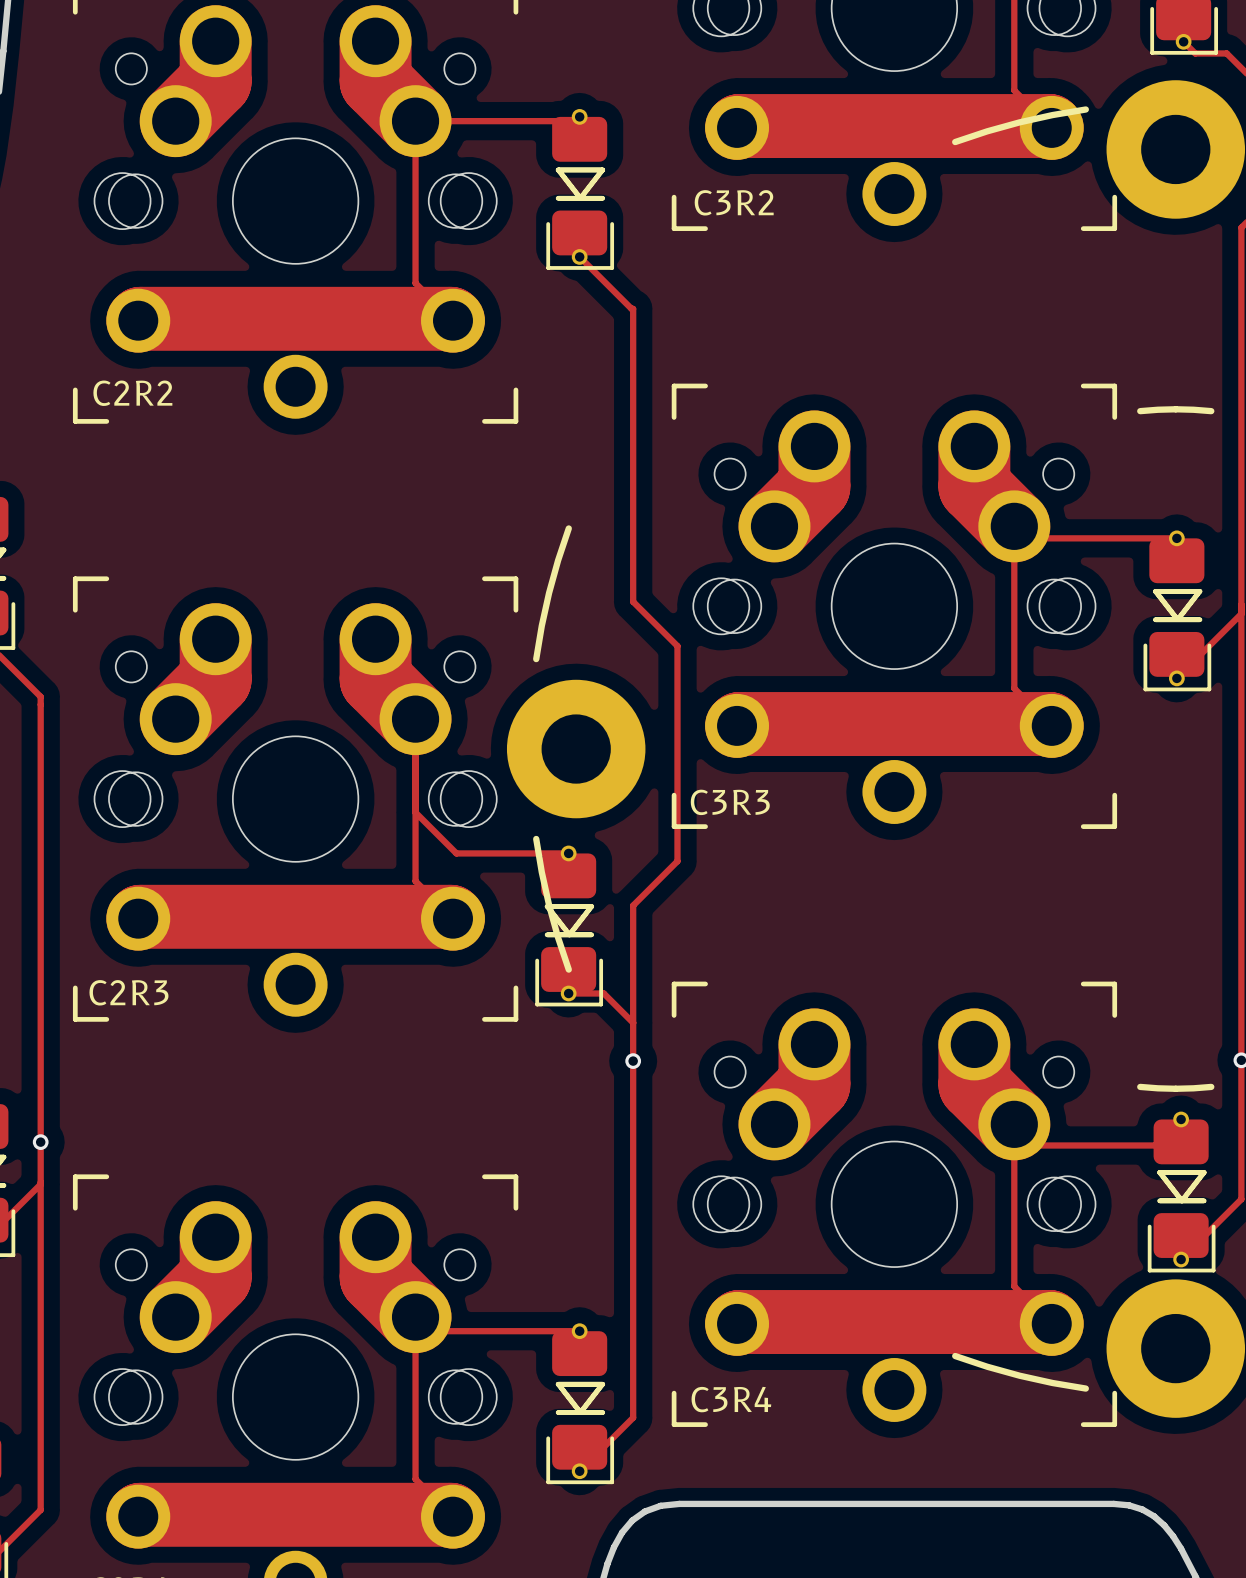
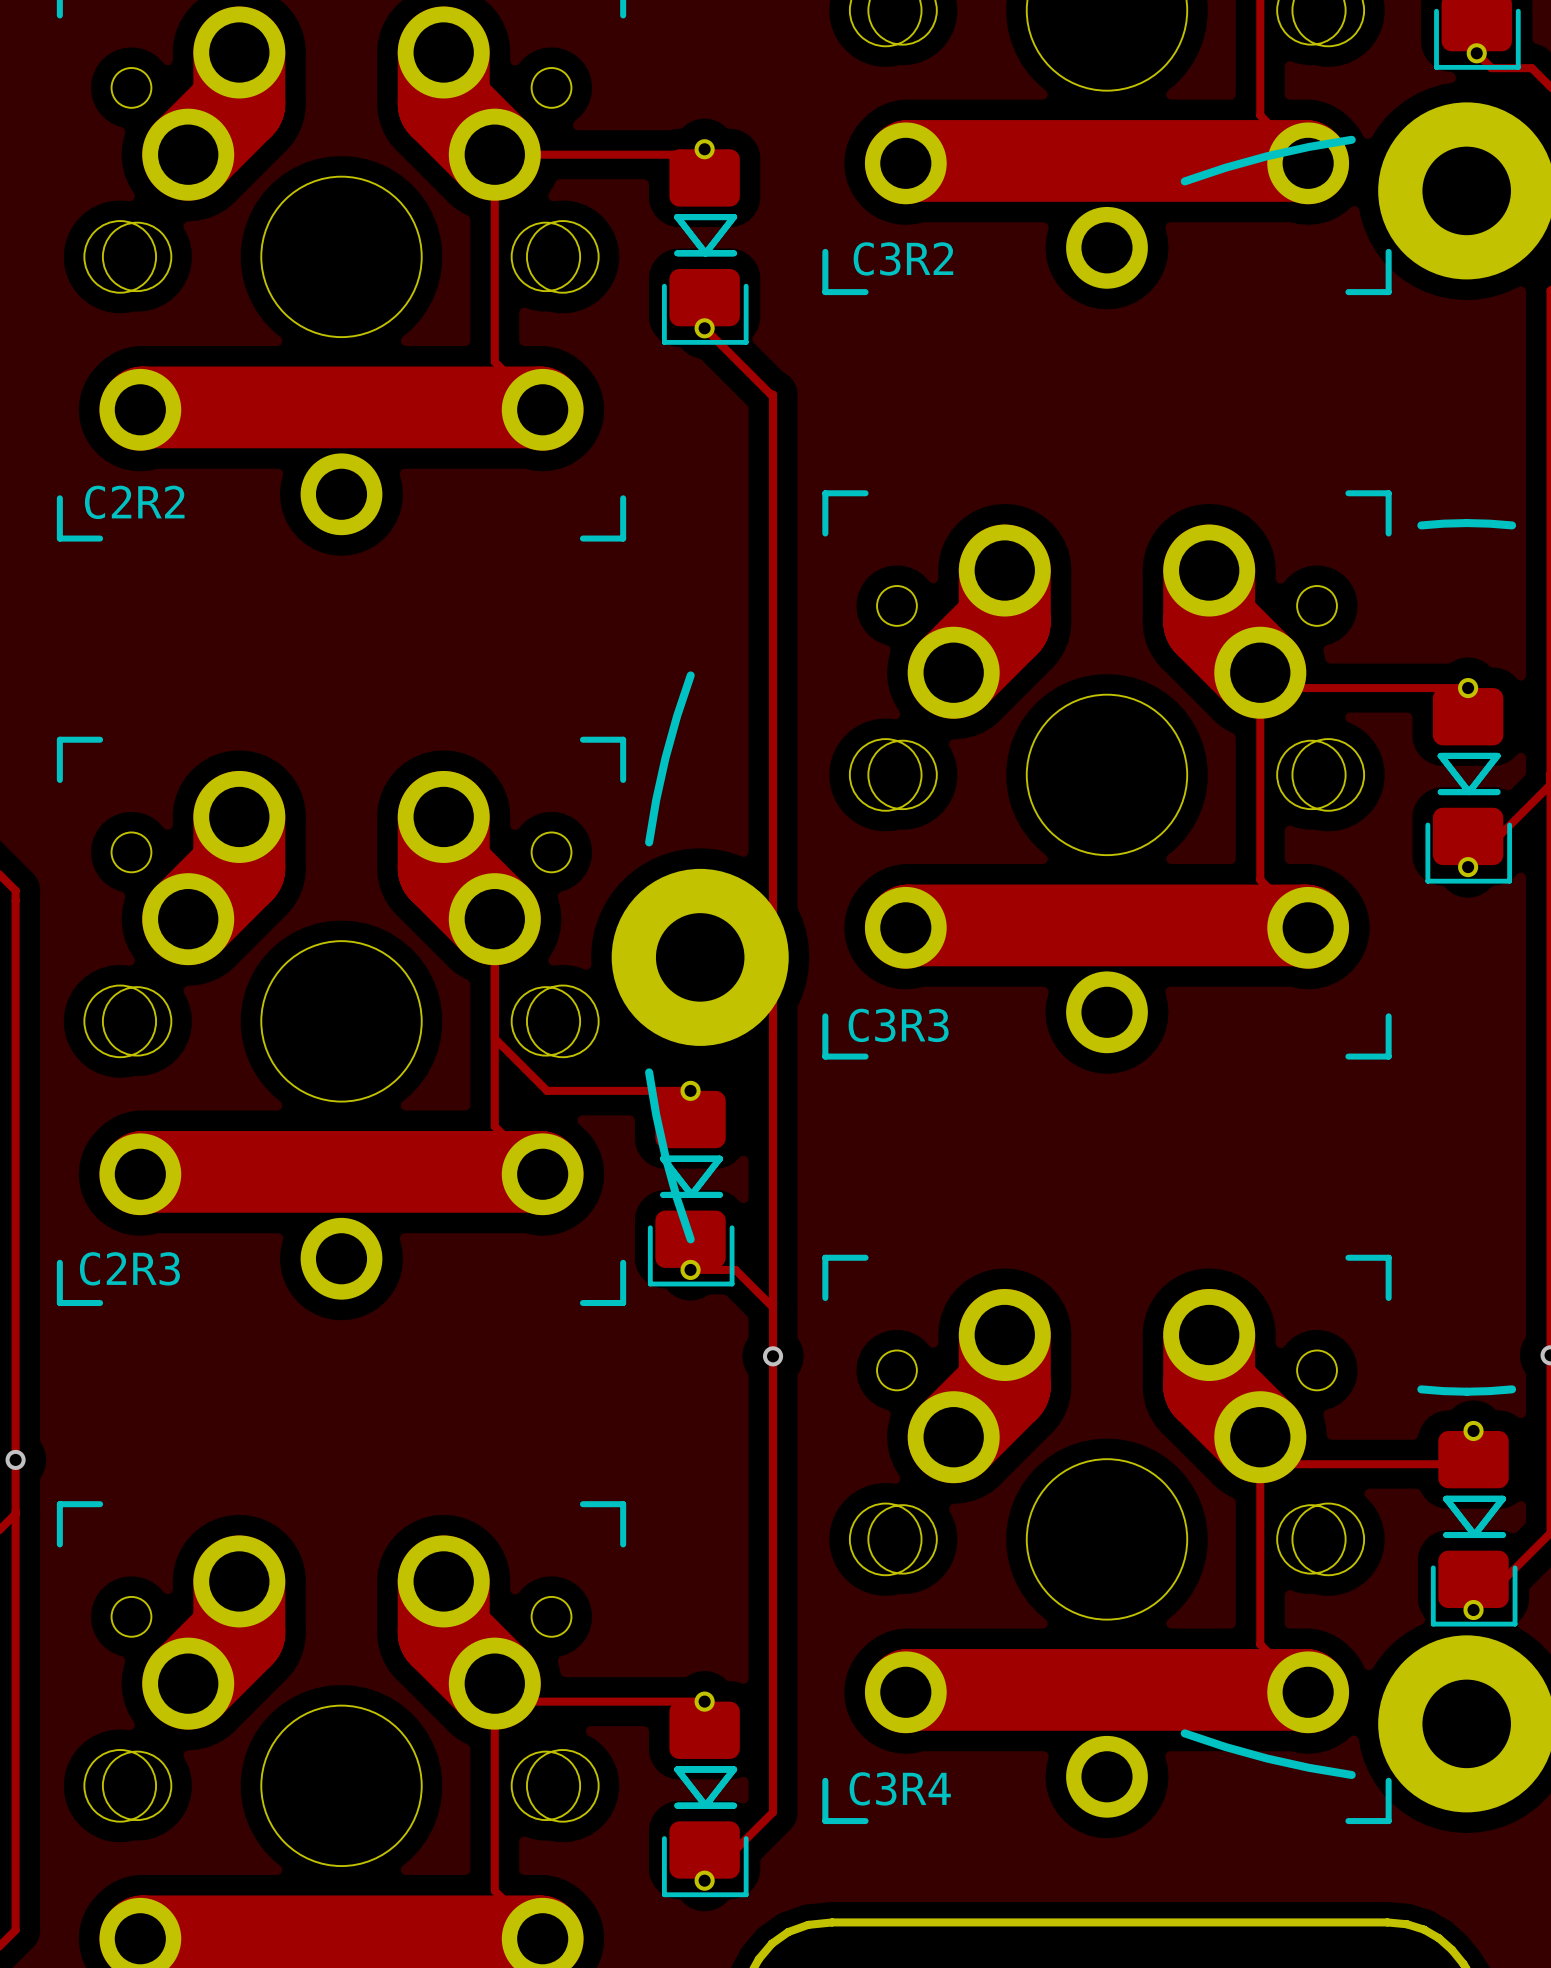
track: (633, 601) (677, 646) (677, 861) (633, 905) -> (773, 769) (773, 1157)

